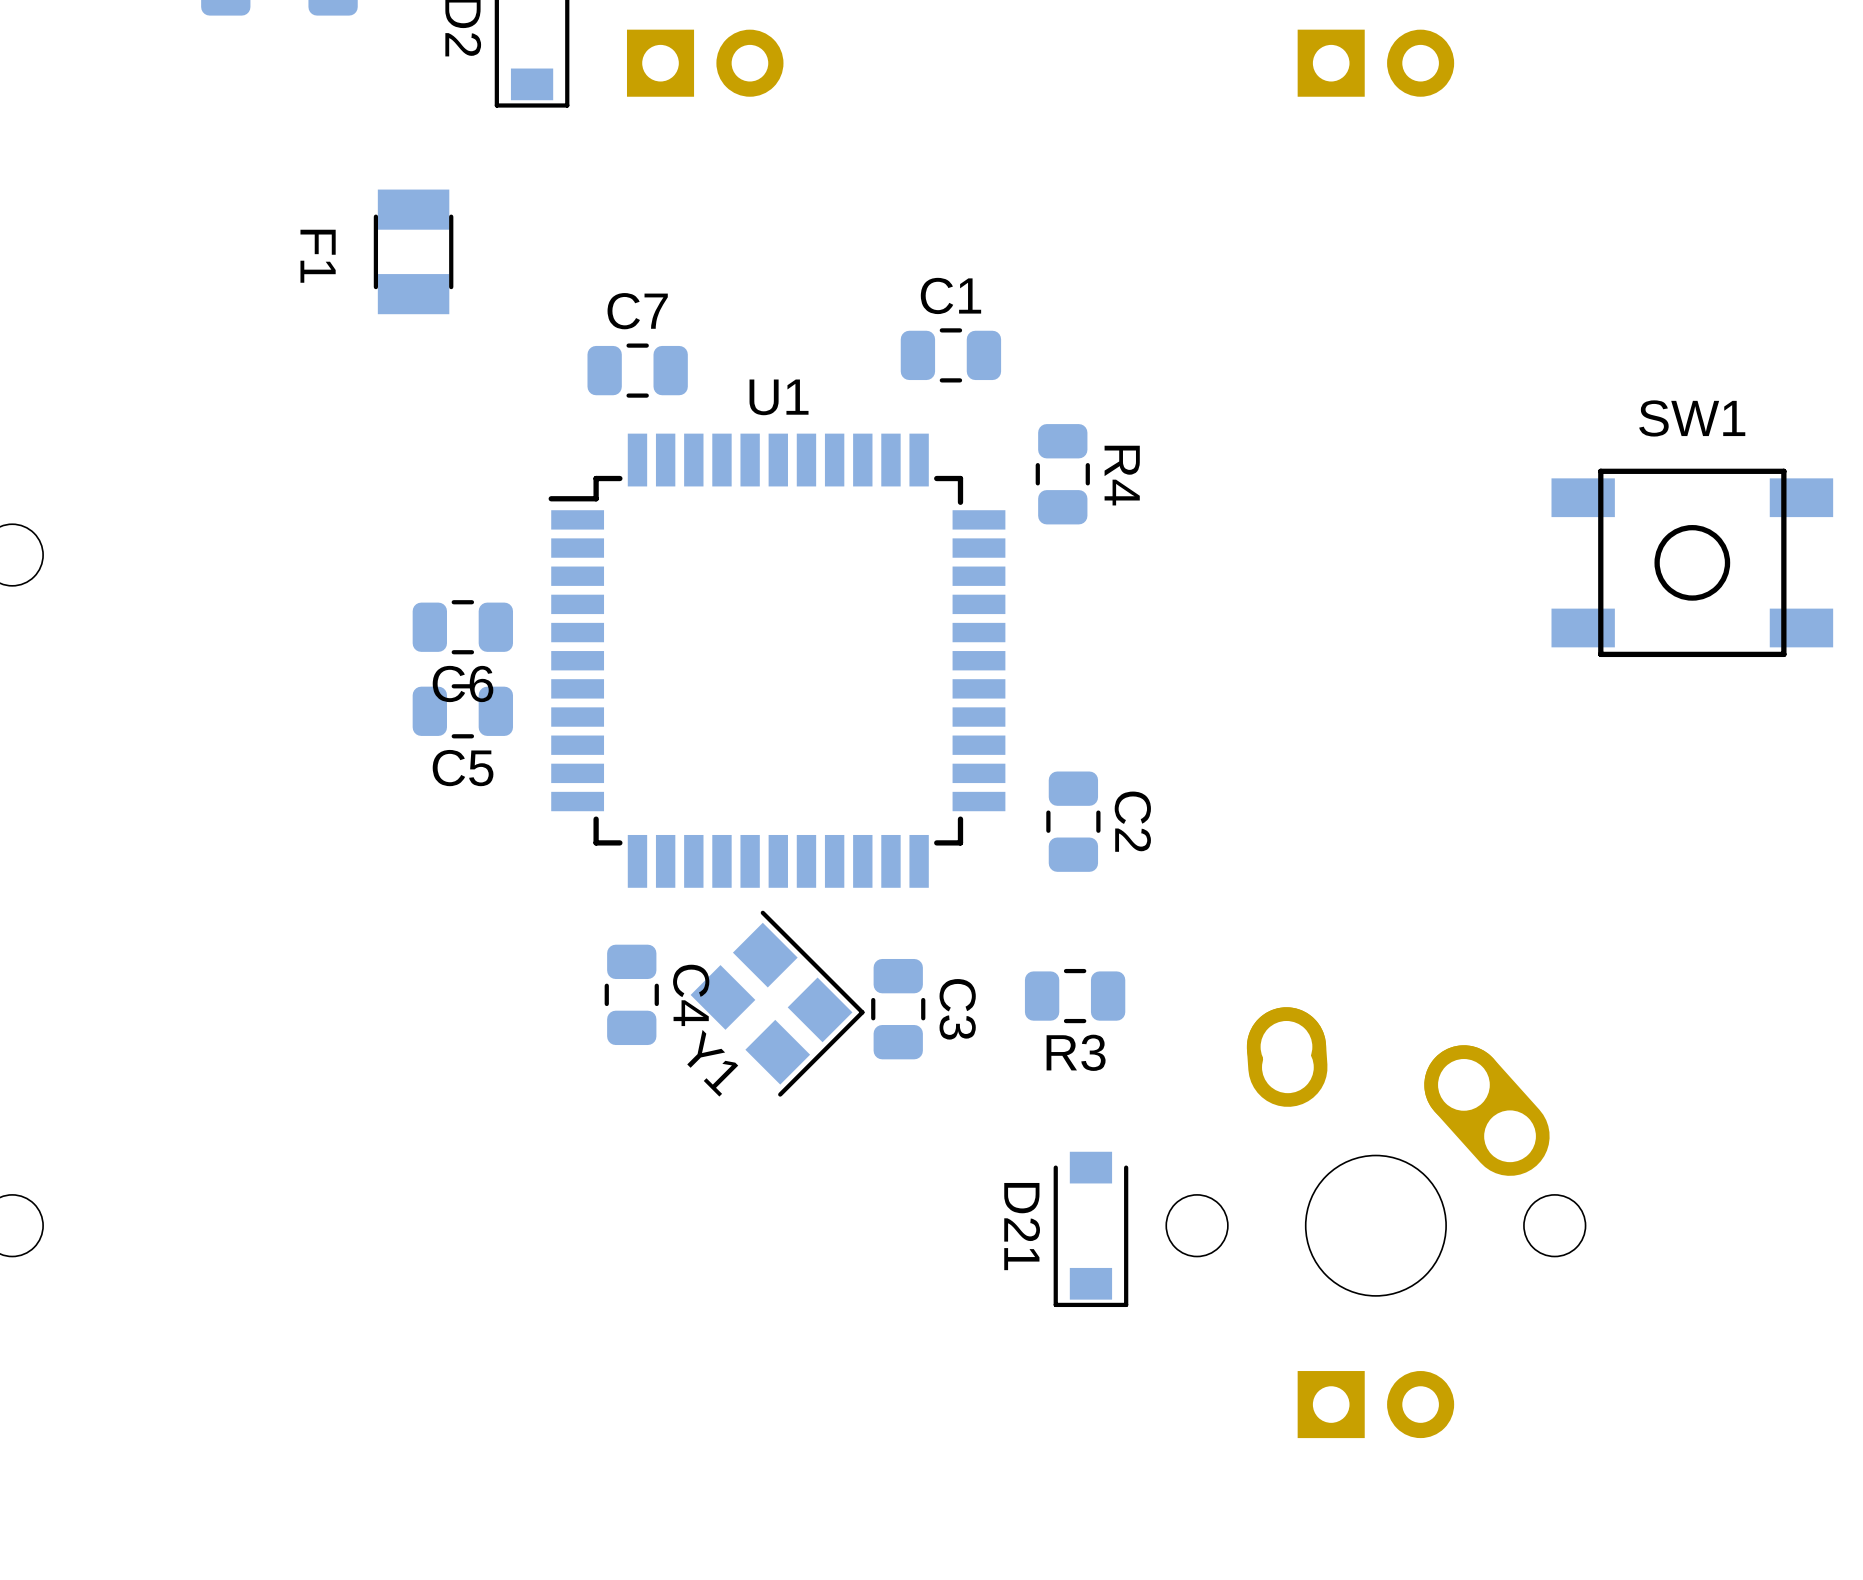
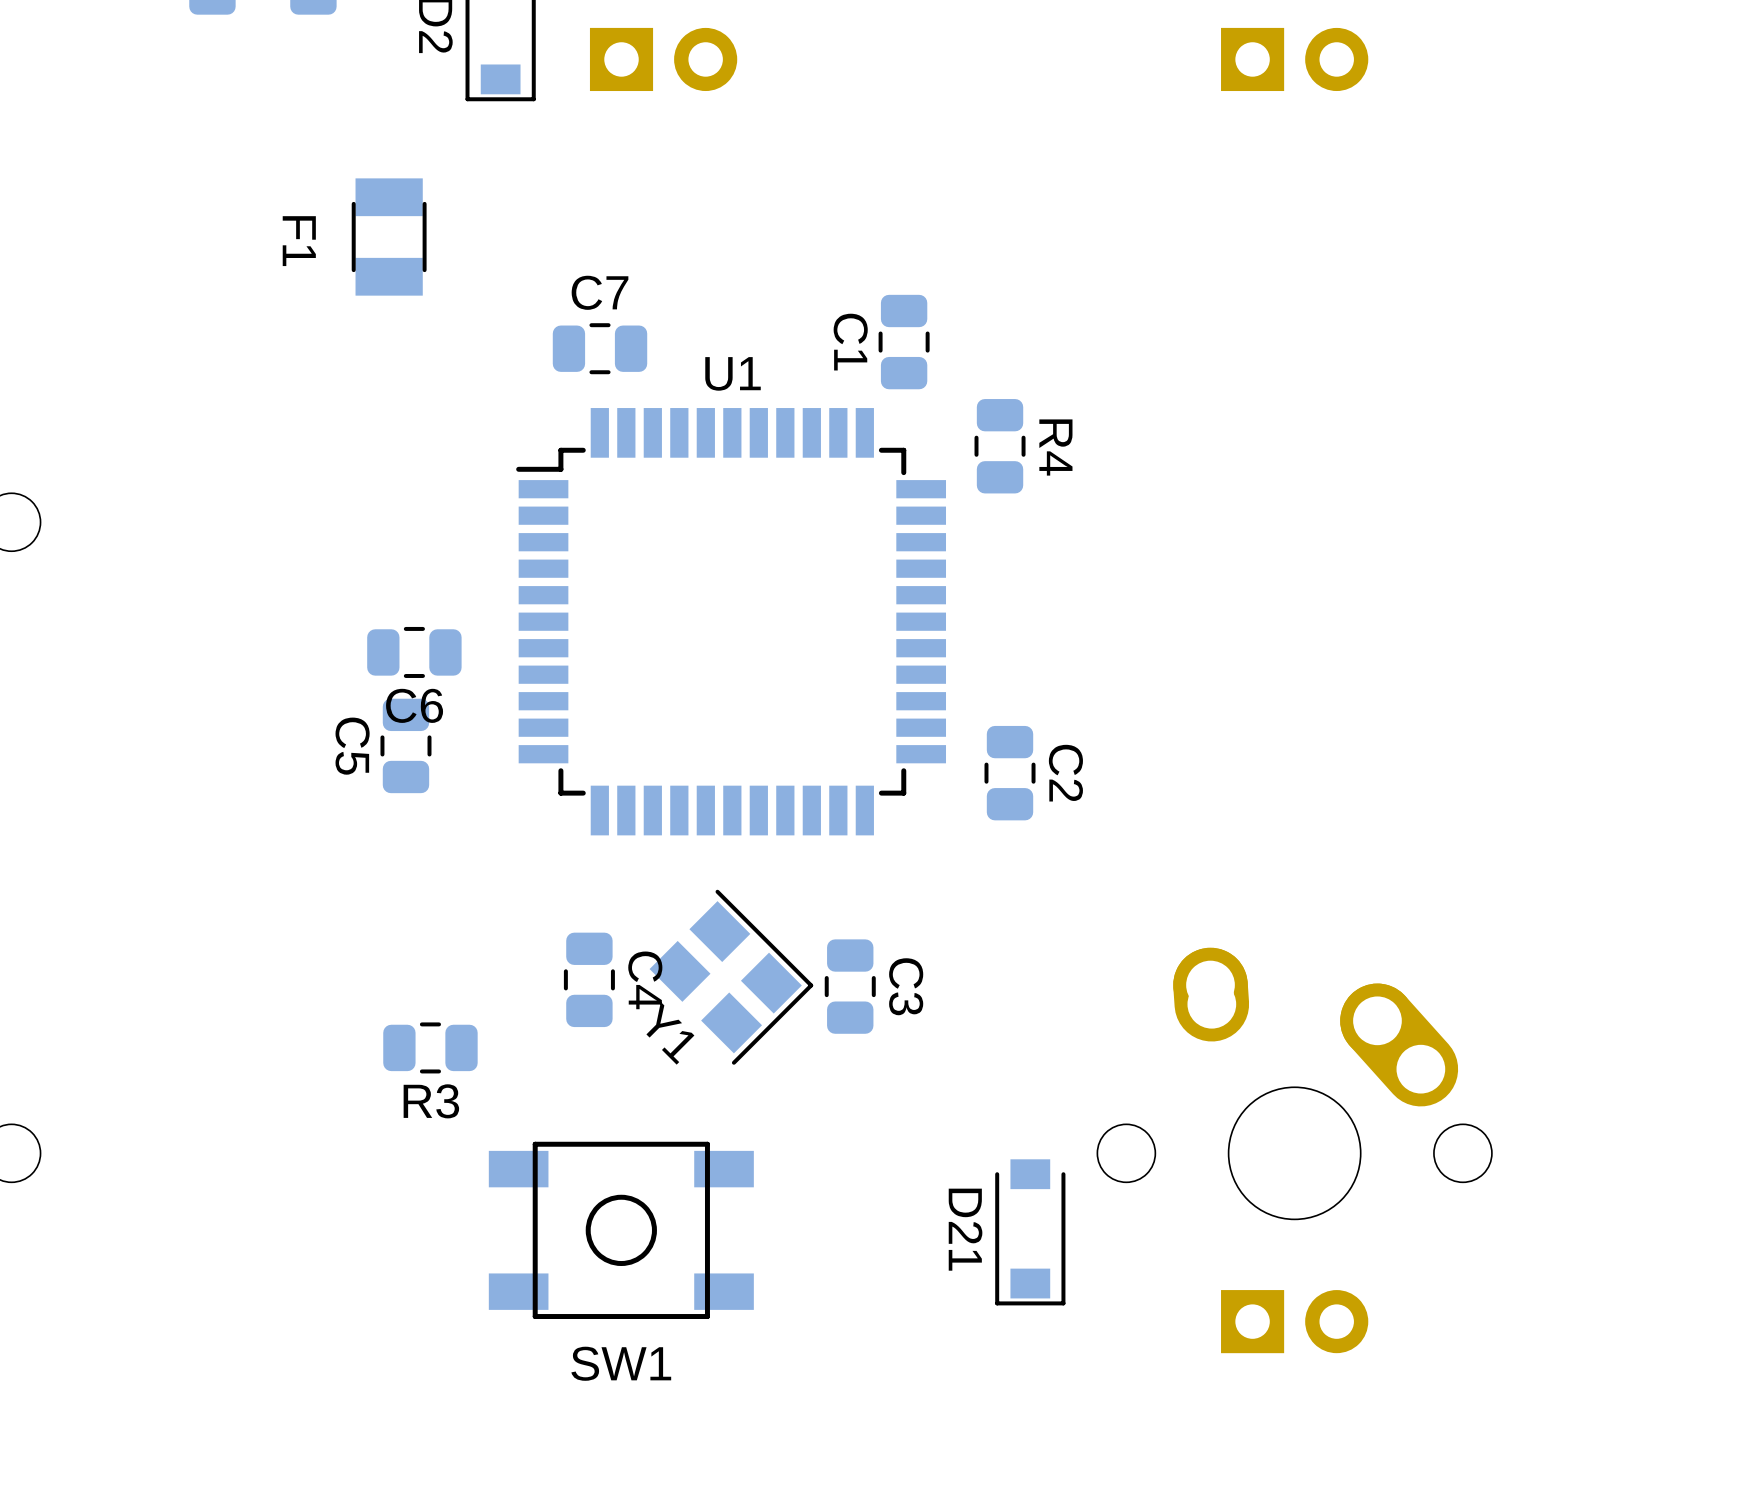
C1 name position: C1 (950, 295) -> C1 (850, 342)
C1 rotation: 0° (950, 355) -> 90° clockwise (904, 342)
SW1 name position: SW1 (1692, 418) -> SW1 (621, 1363)
SW1 position: (1692, 562) -> (621, 1230)
C6 position: (462, 627) -> (414, 652)
C5 rotation: 0° (462, 711) -> 90° clockwise (405, 745)
C5 position: (462, 711) -> (405, 745)
C4 position: (631, 994) -> (589, 979)
R3 position: (1075, 996) -> (430, 1047)
Y1 position: (777, 1003) -> (731, 977)
C3 position: (898, 1009) -> (850, 986)
D21 position: (1090, 1229) -> (1030, 1232)

